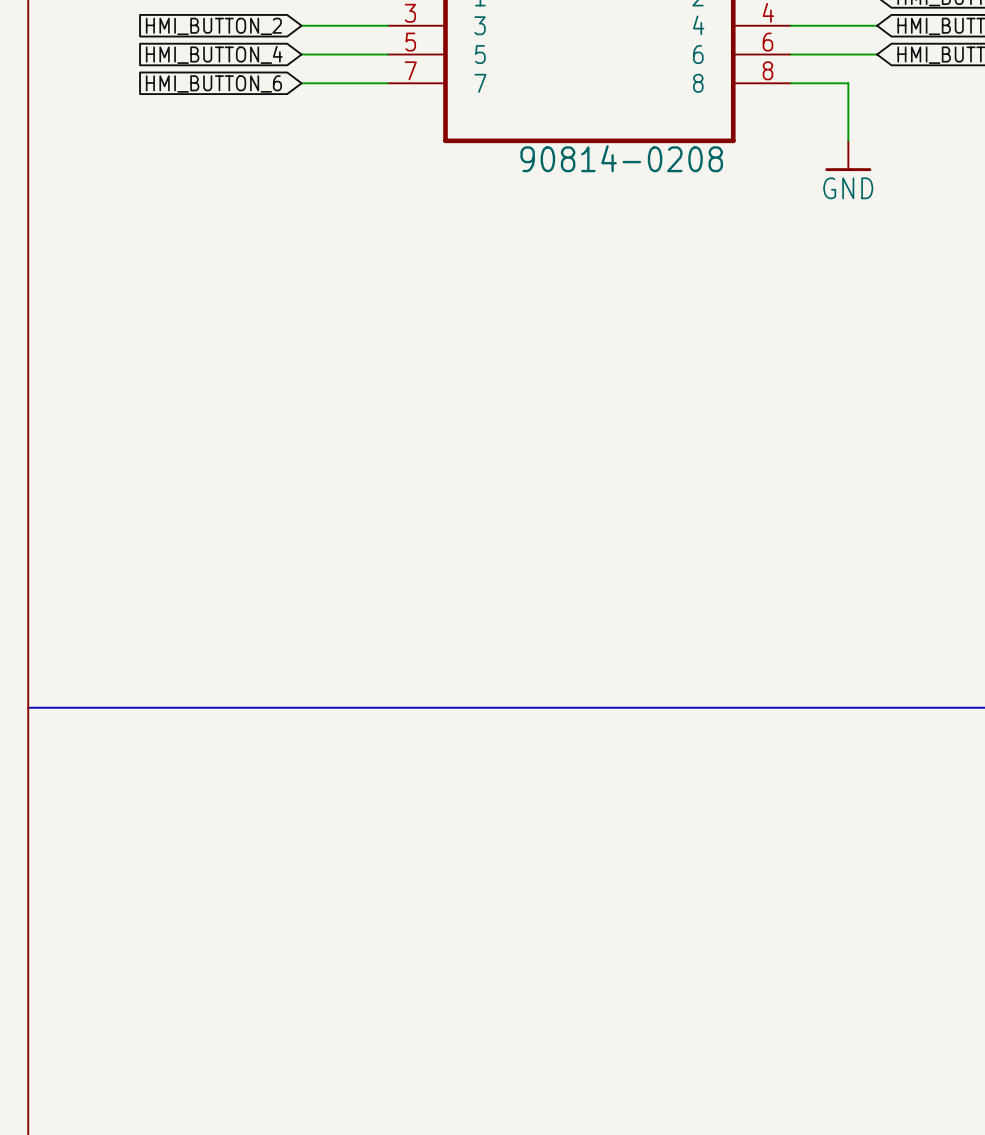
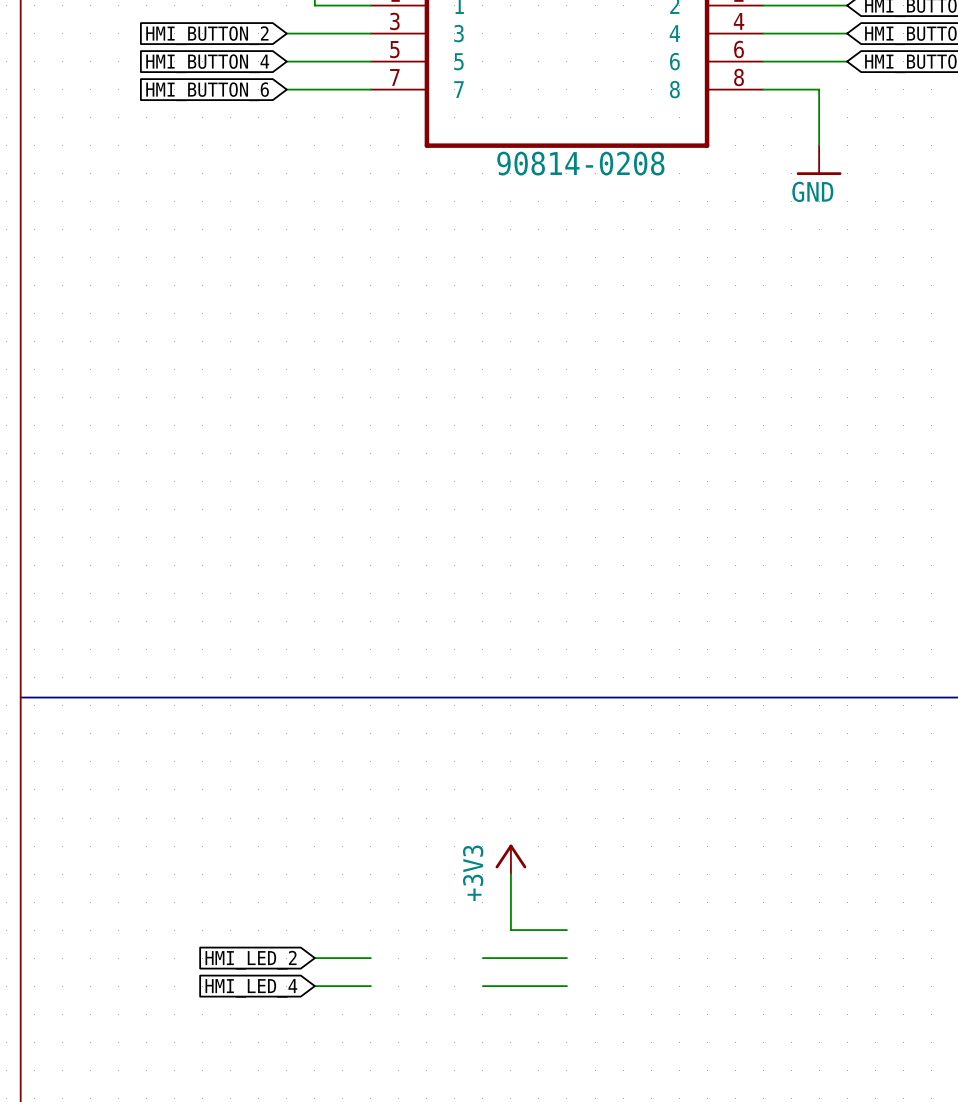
power symbol: none -> +3V3 (510, 859)
wire: none -> (510, 874) (510, 930) (566, 930)
wire: none -> (314, 958) (370, 958)
wire: none -> (482, 958) (566, 958)
global label: none -> HMI_LED_2 (251, 960)
global label: none -> HMI_LED_4 (251, 988)
wire: none -> (314, 986) (370, 986)
wire: none -> (482, 986) (566, 986)

